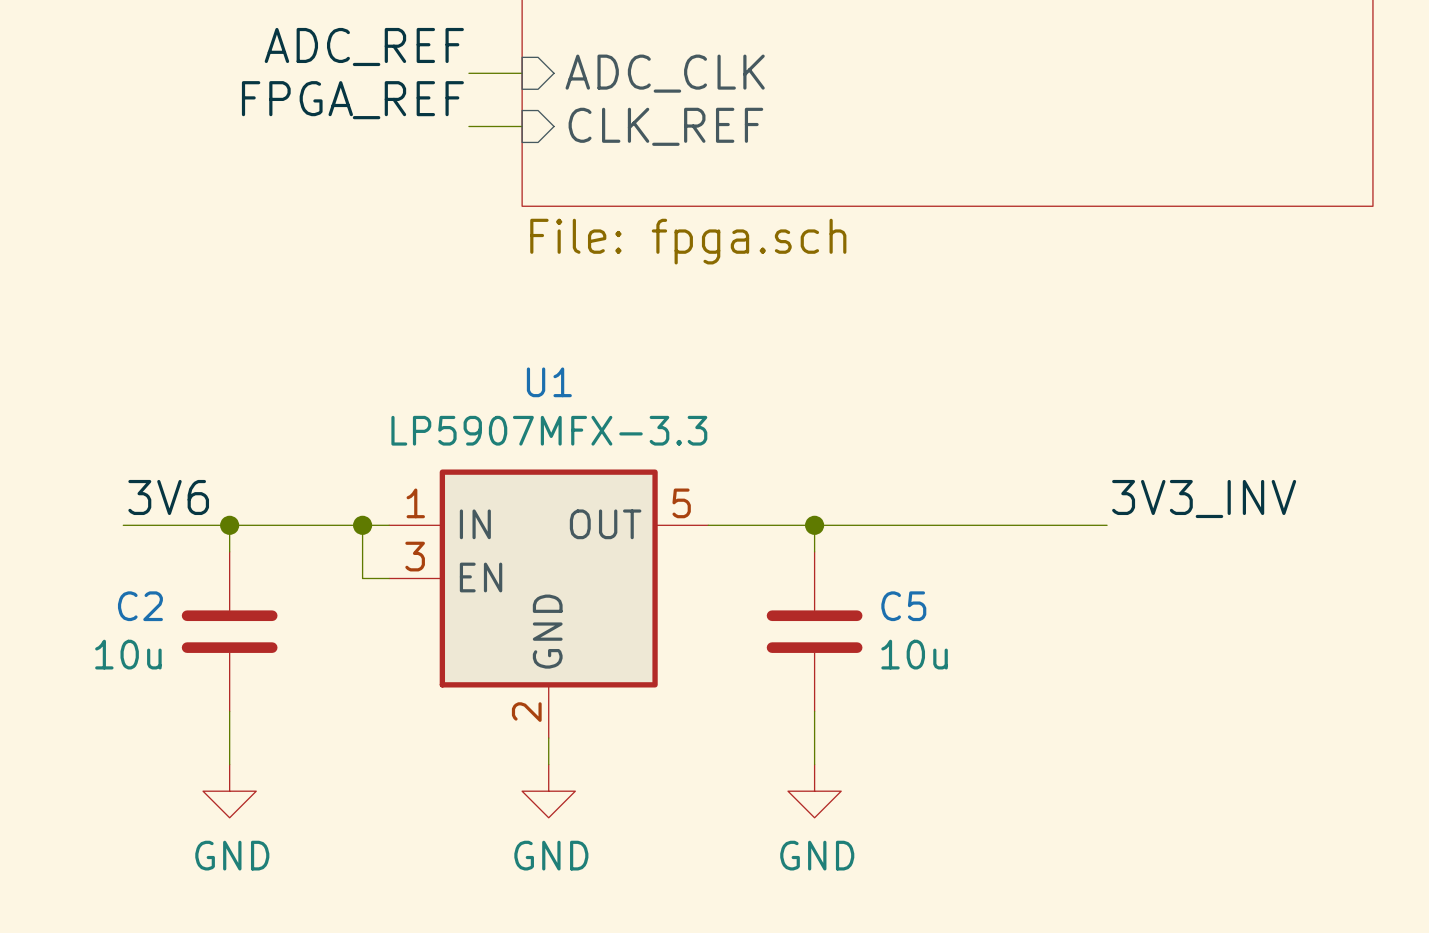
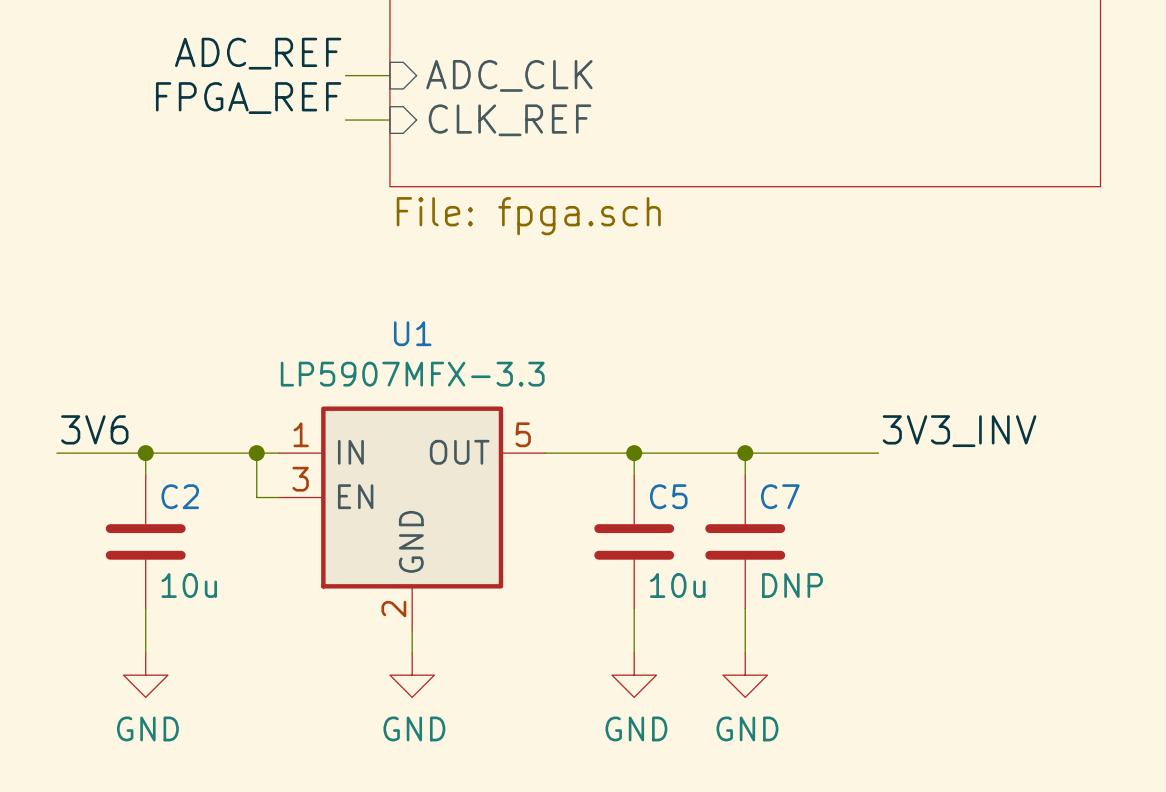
wire: none -> (745, 453) (745, 475)
junction: none -> (745, 453)
C2 name position: C2 (140, 606) -> C2 (180, 496)
C5 name position: C5 (903, 606) -> C5 (668, 496)
C7: none -> DNP (745, 541)
C2 value position: 10u (128, 654) -> 10u (189, 585)
C5 value position: 10u (914, 654) -> 10u (677, 585)
wire: none -> (745, 608) (745, 652)
power symbol: none -> GND (745, 675)

